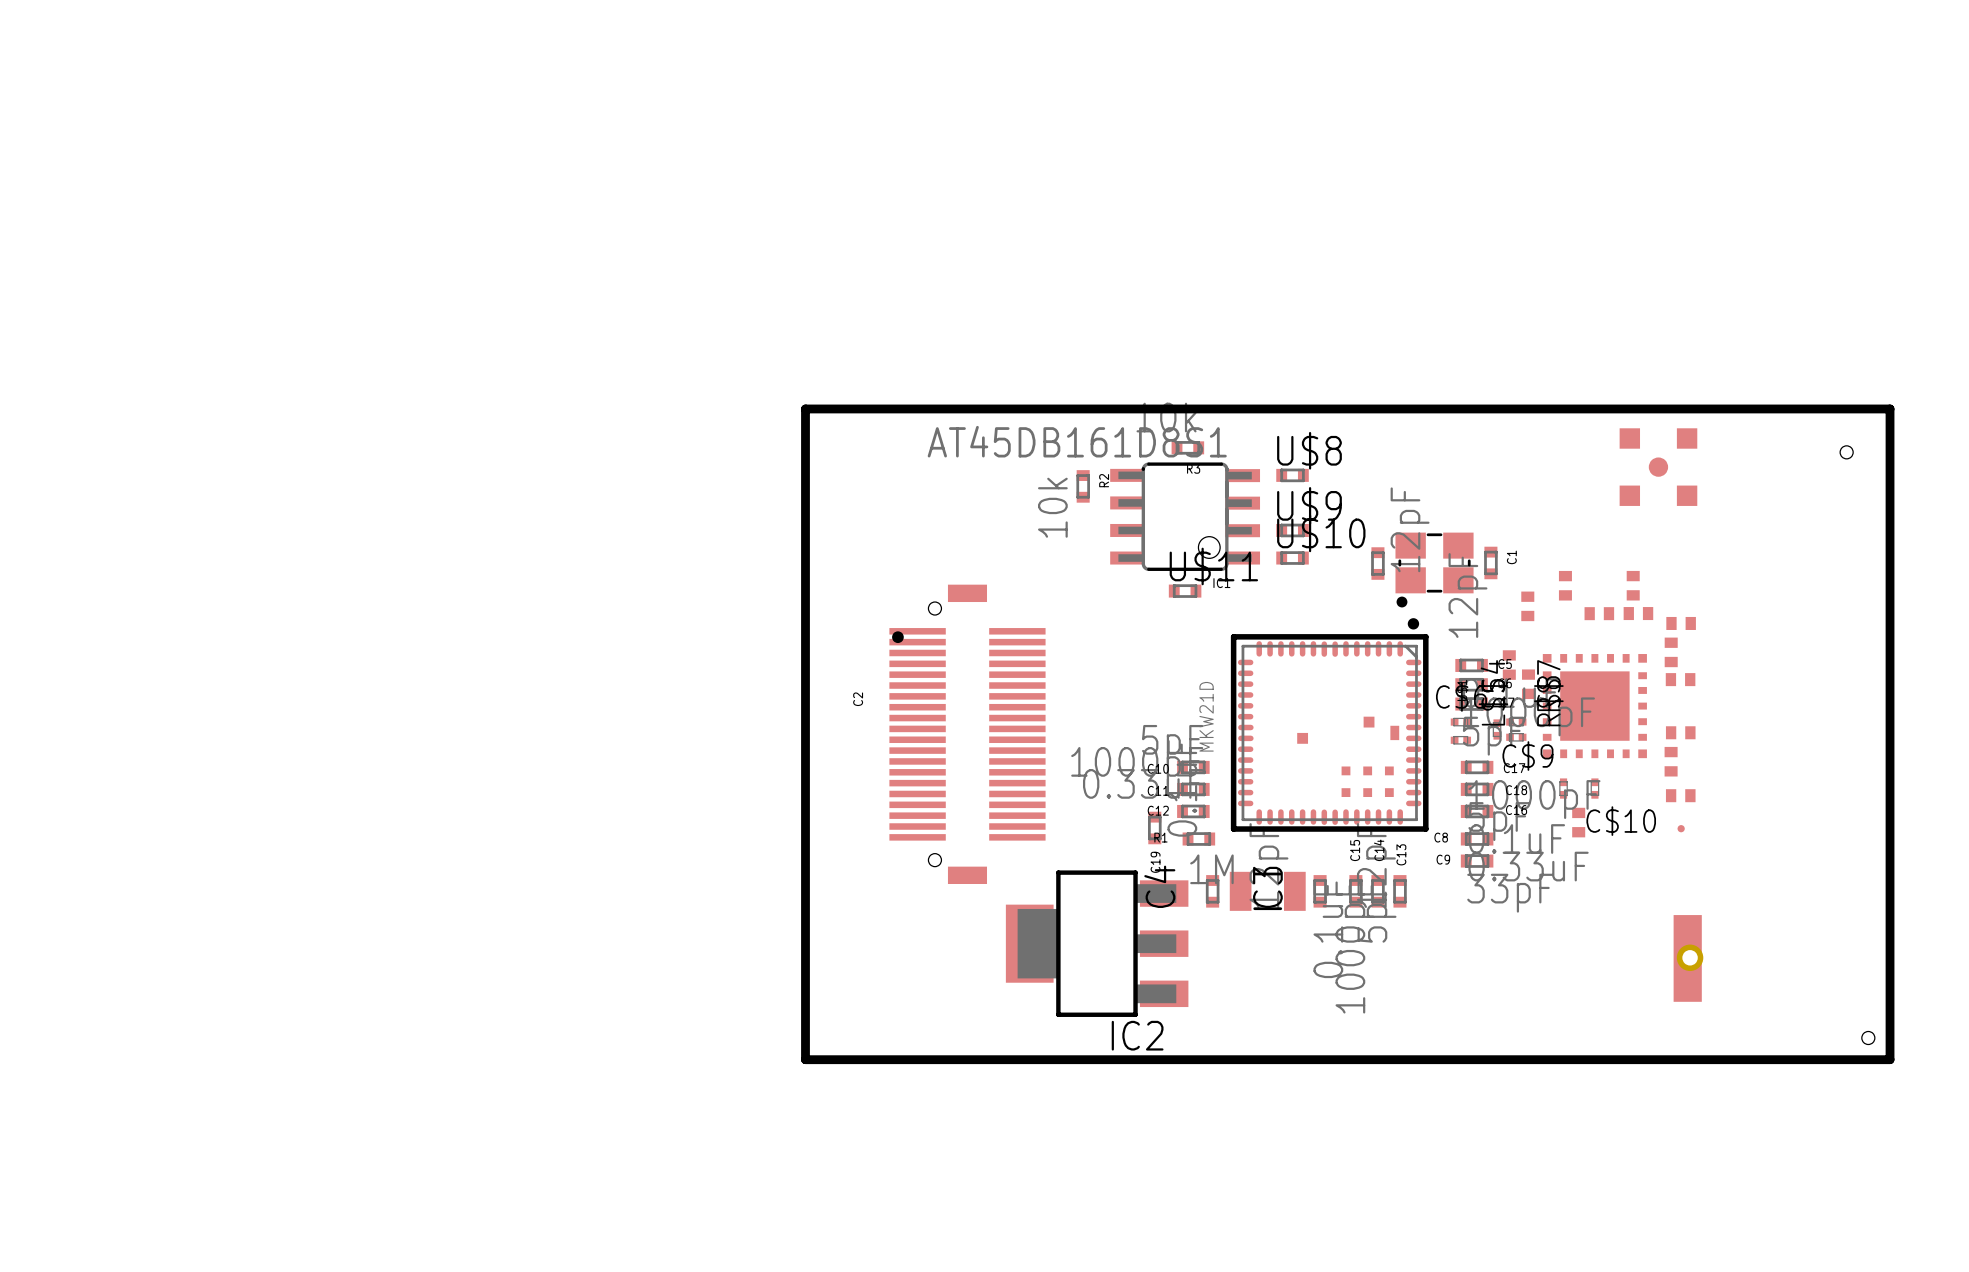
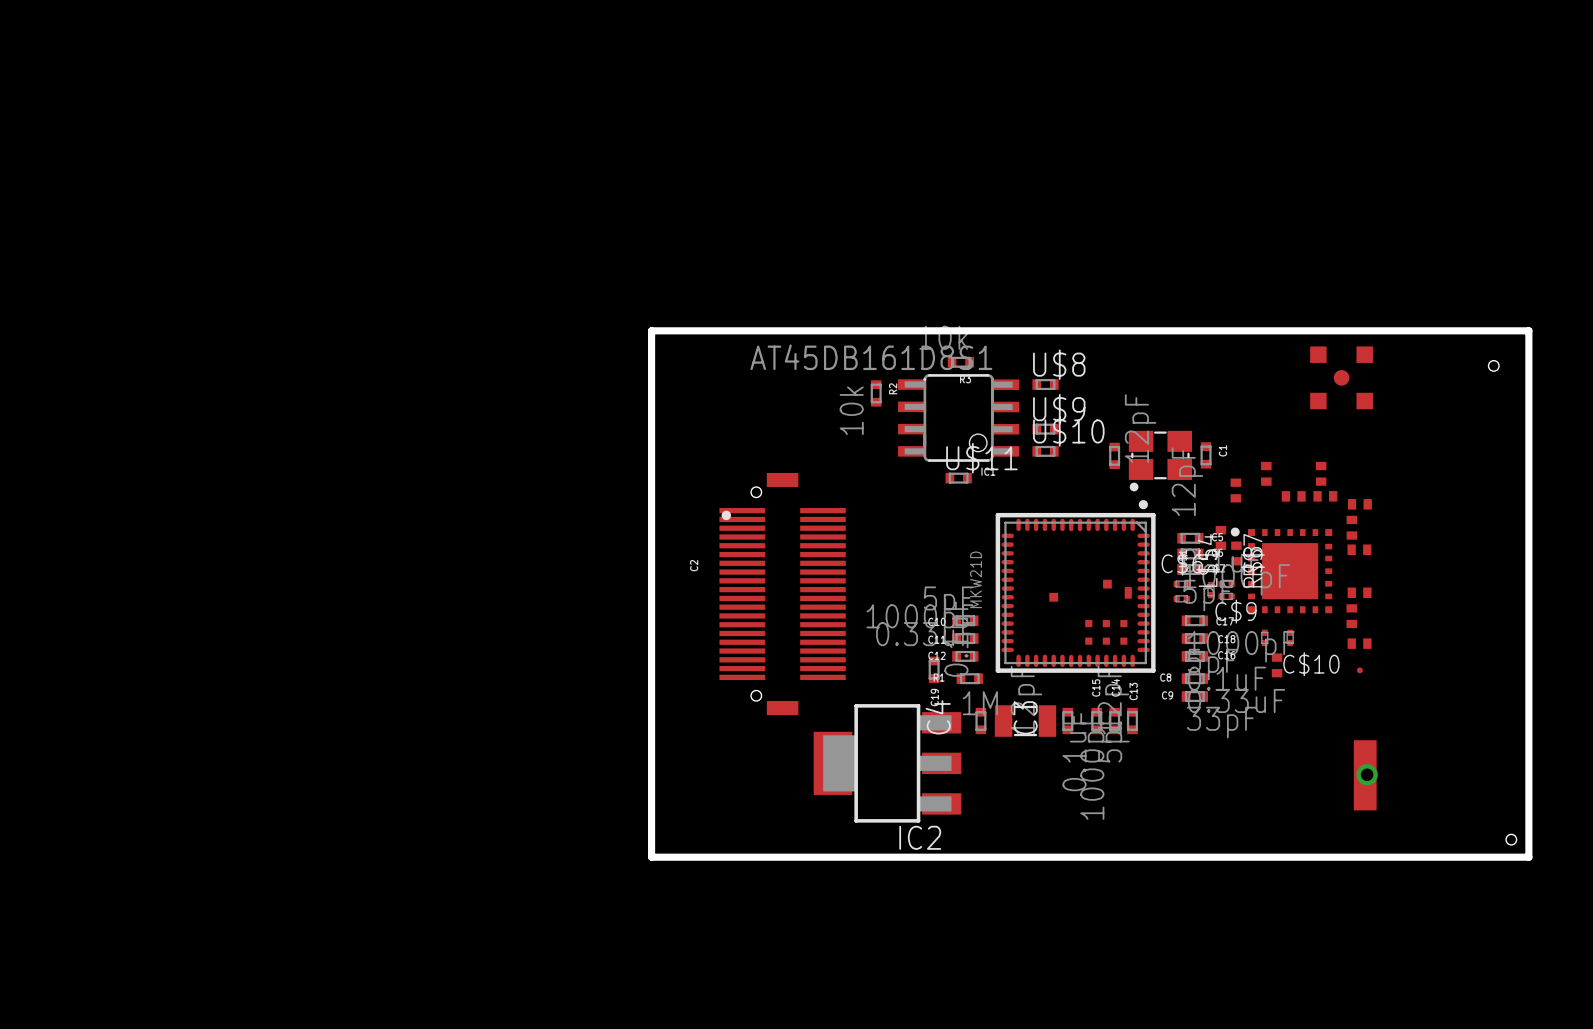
part footprint: [1542, 654, 1647, 759] -> [1230, 527, 1333, 614]

